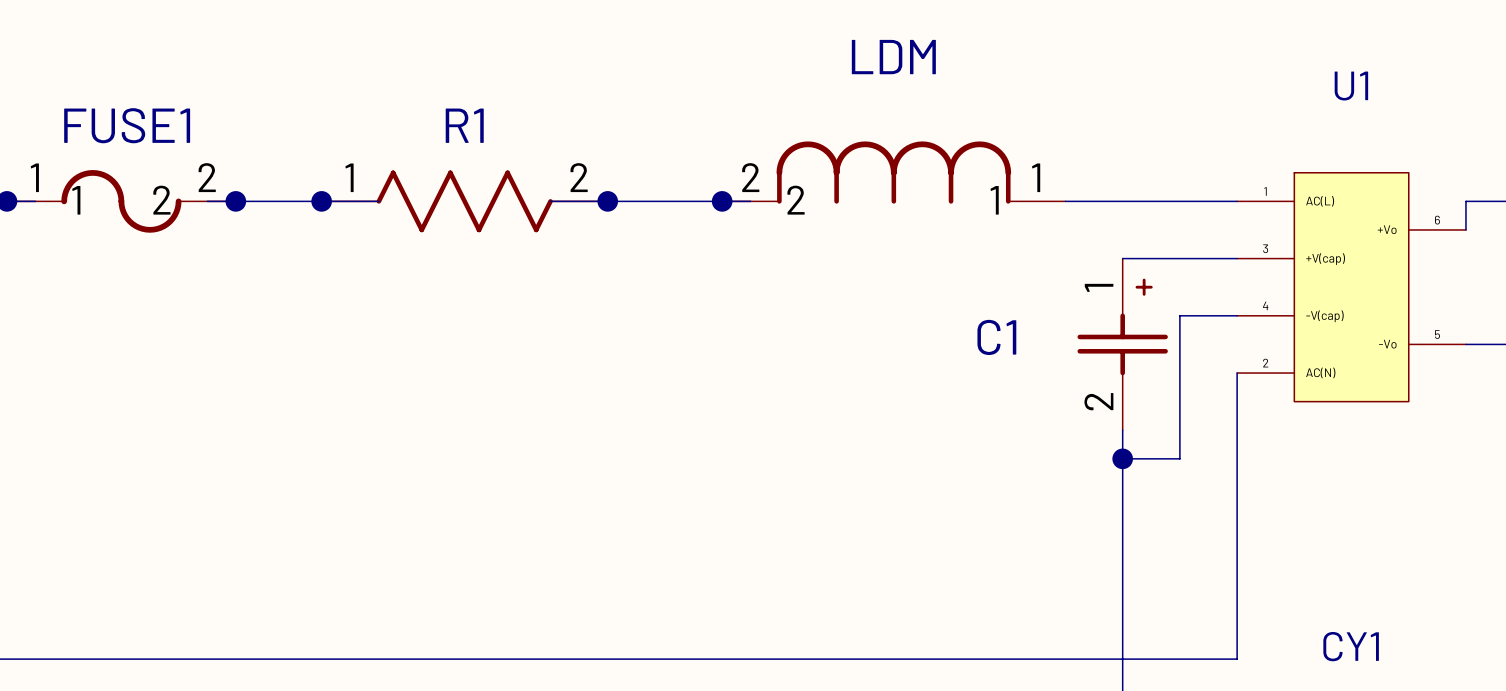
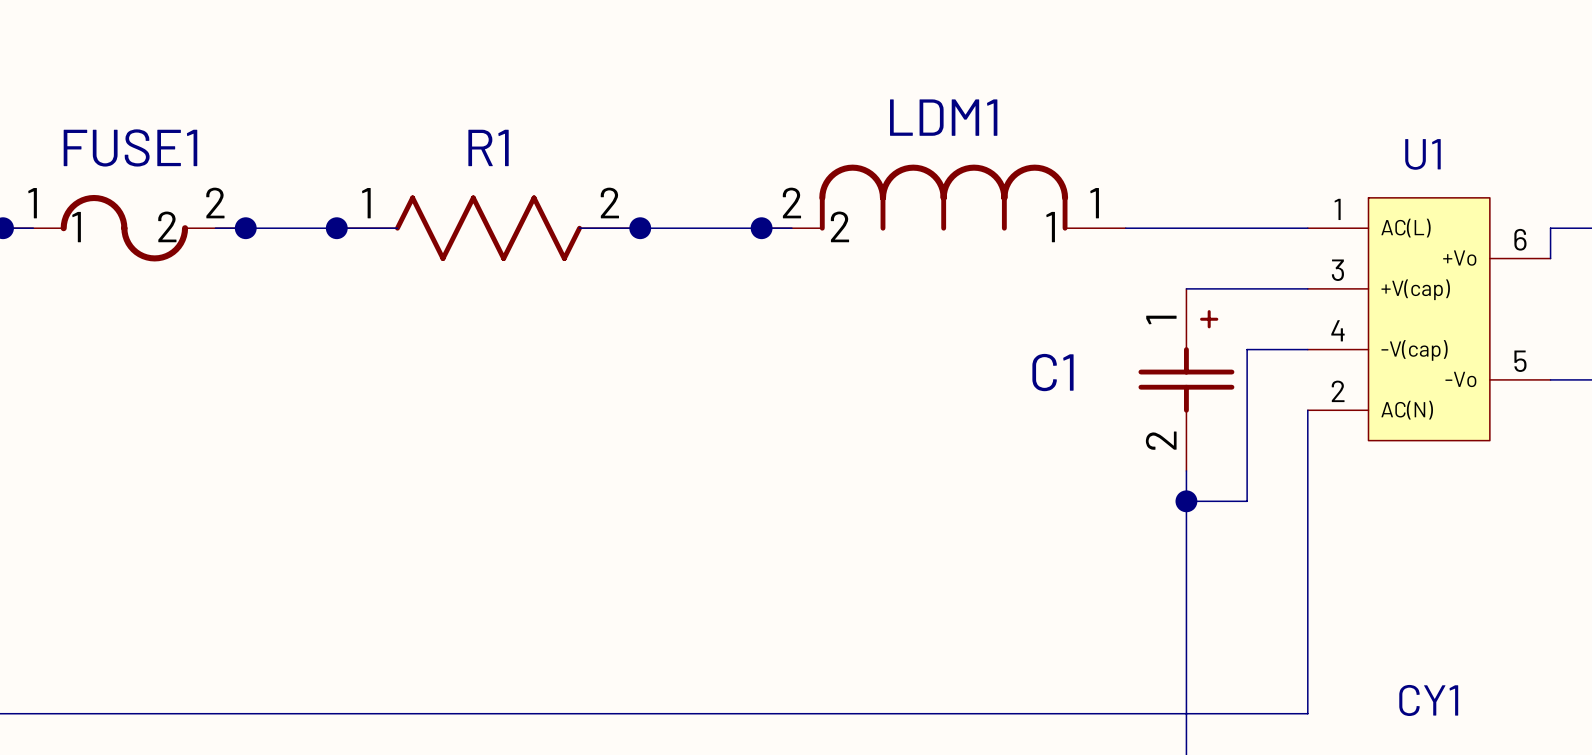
LDM name: LDM (893, 57) -> LDM1 (943, 117)
U1 name position: U1 (1351, 86) -> U1 (1422, 154)
U1 symbol: [1237, 172, 1466, 402] -> [1307, 197, 1551, 441]

